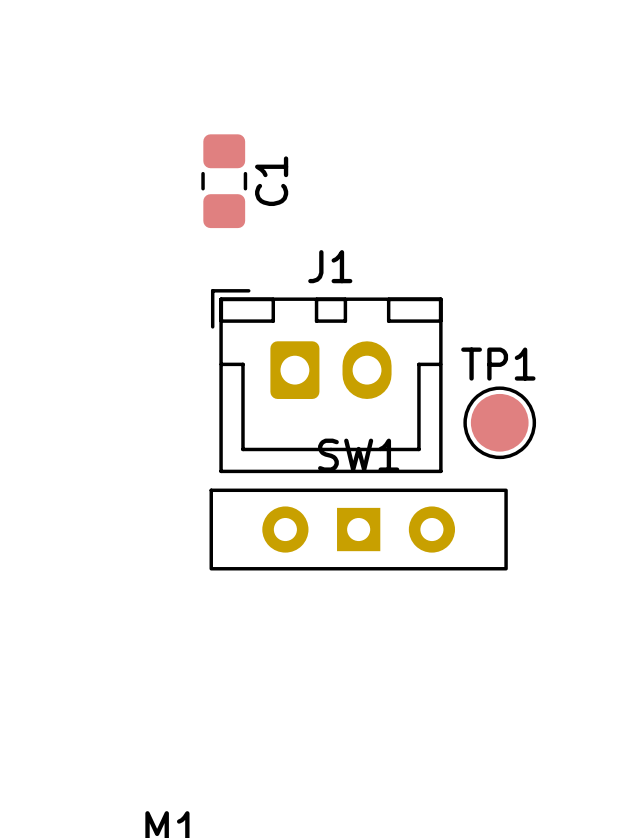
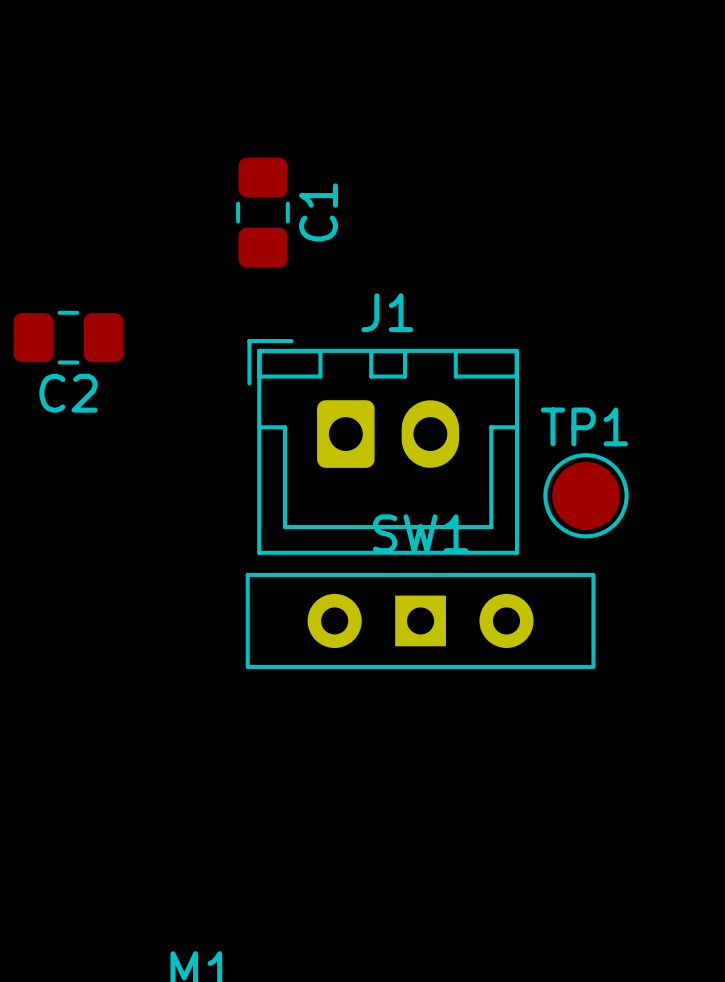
C2: none -> (68, 337)

